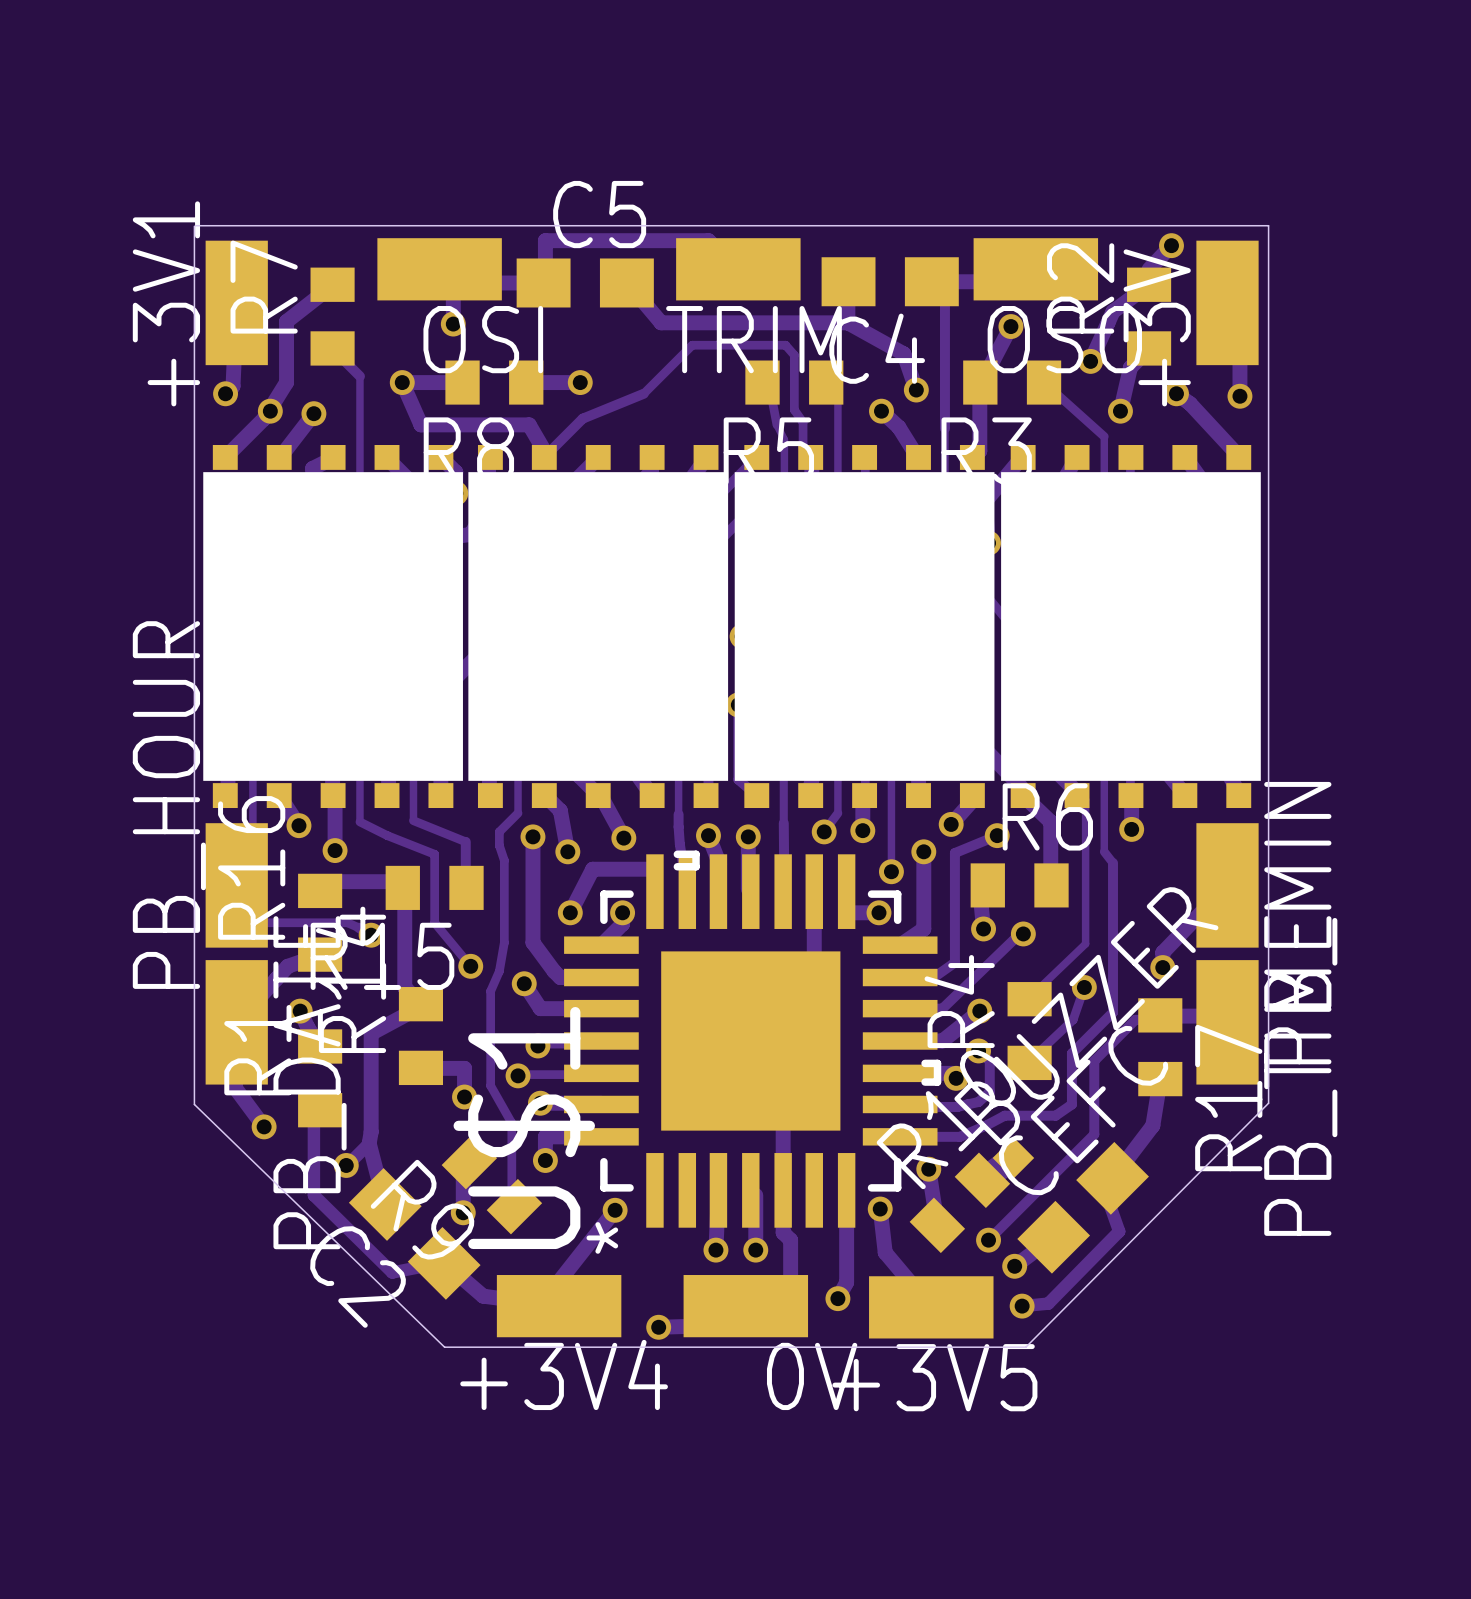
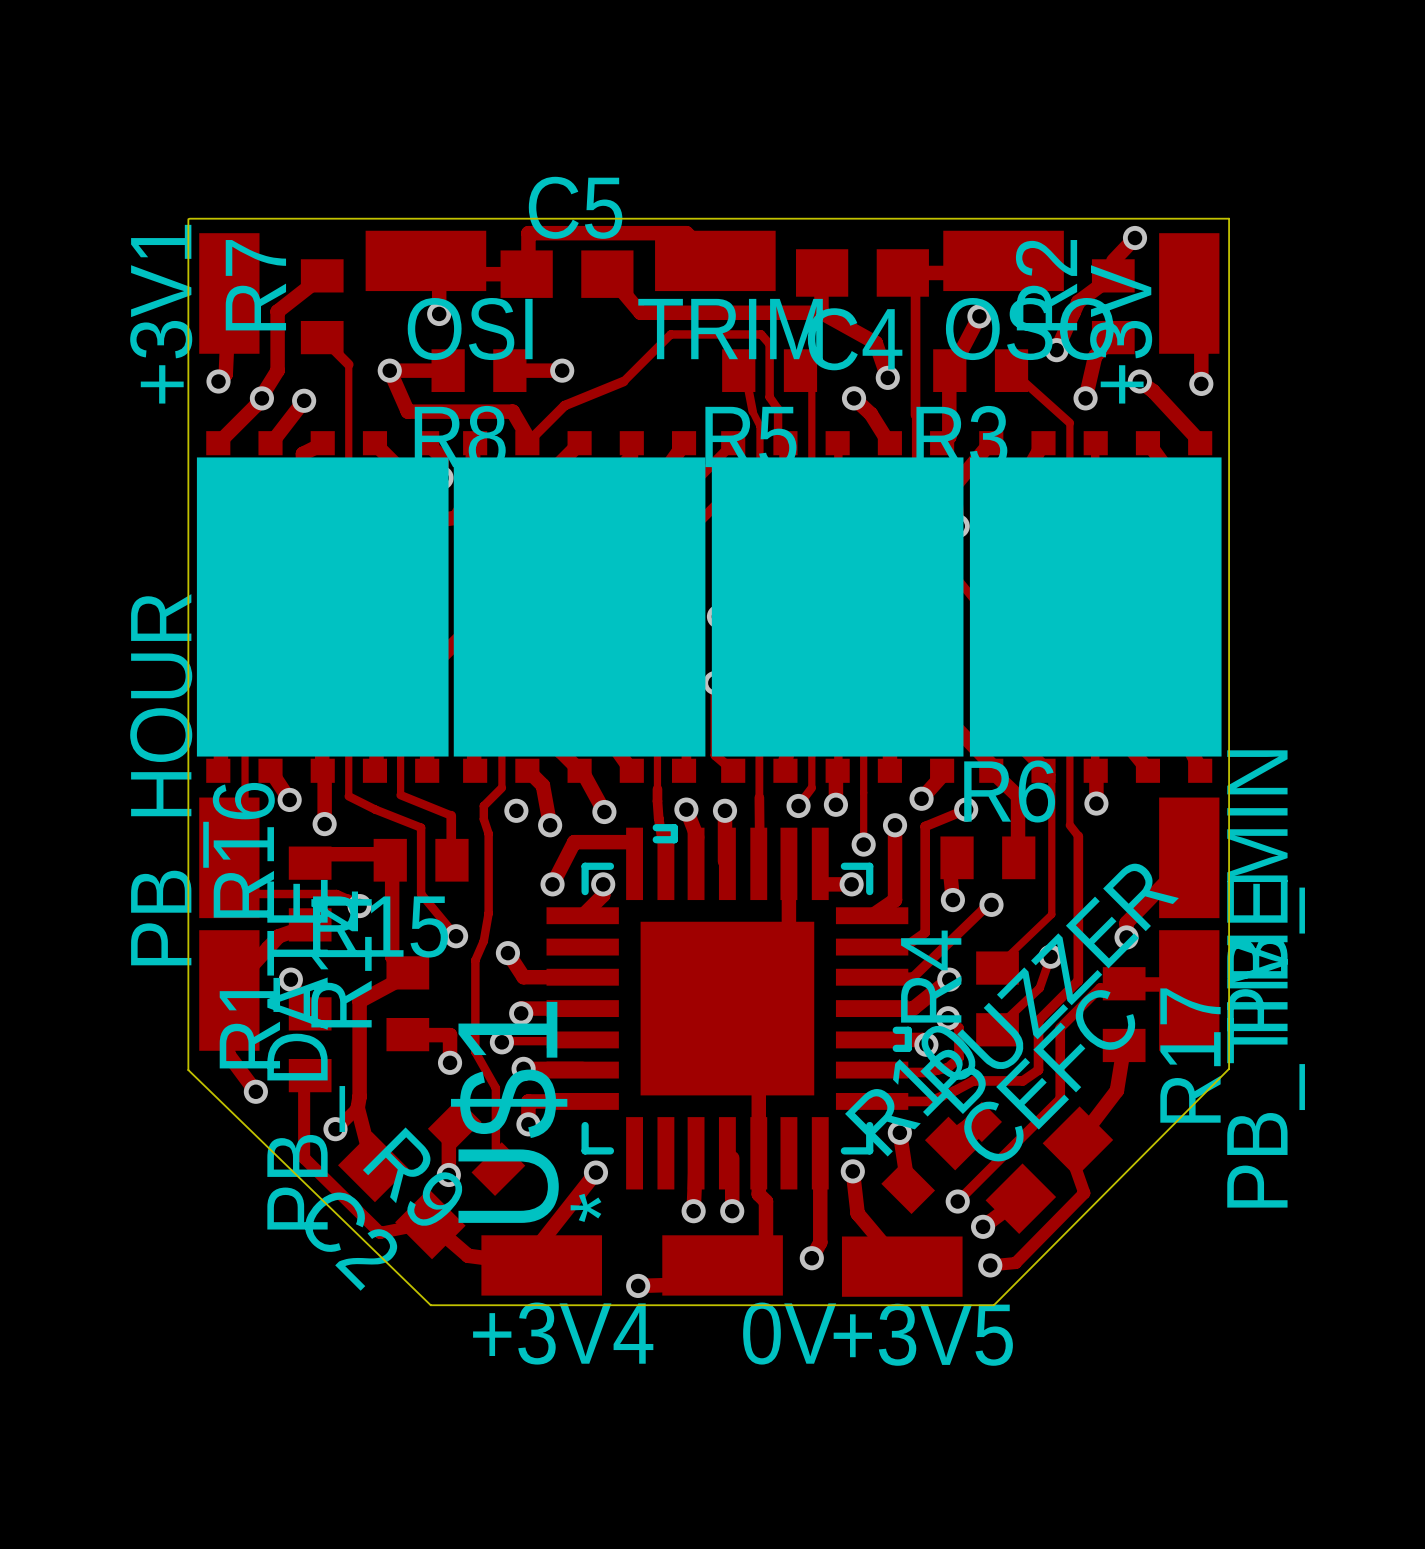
track: (532, 836) (532, 942) (560, 977) (601, 977) -> none

